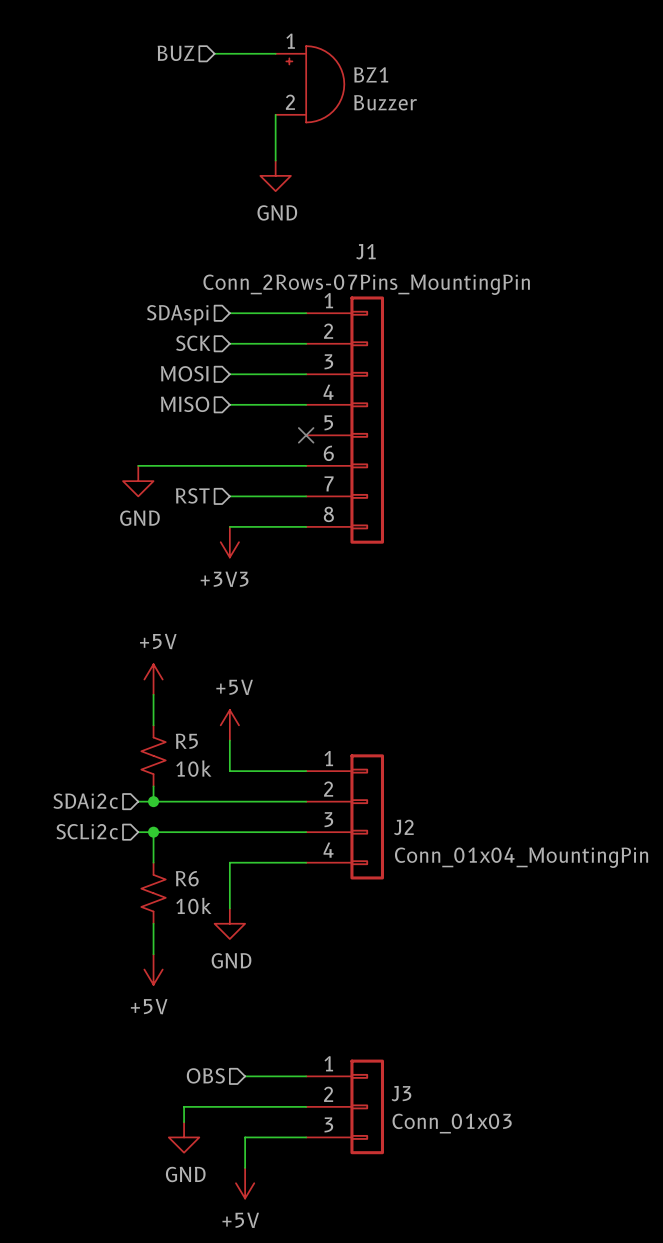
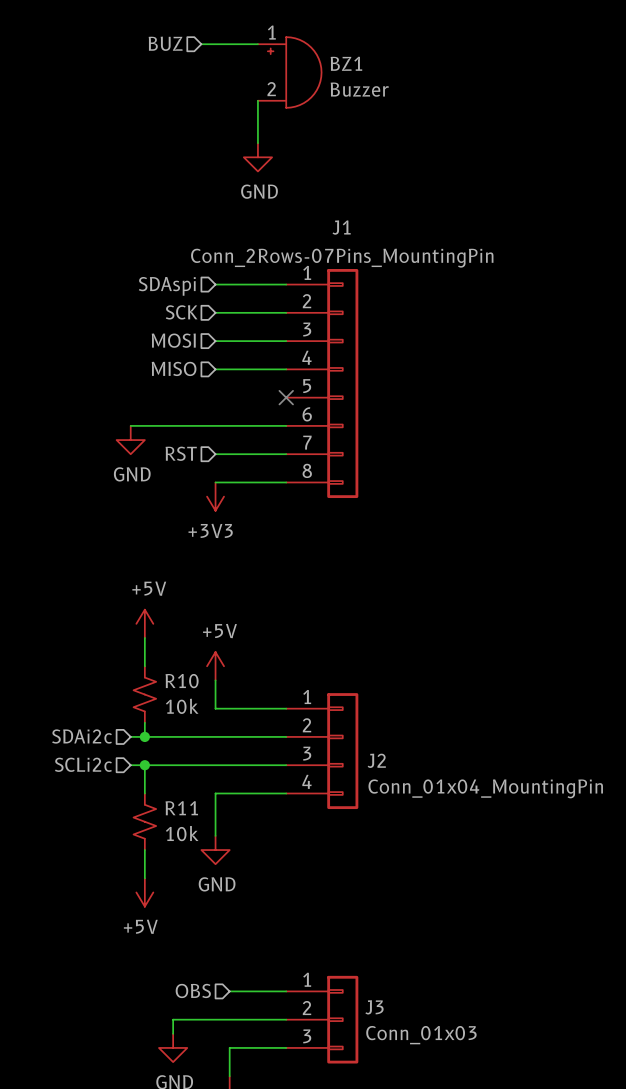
R5 name: R5 (186, 741) -> R10 (182, 681)
R6 name: R6 (187, 878) -> R11 (181, 808)

